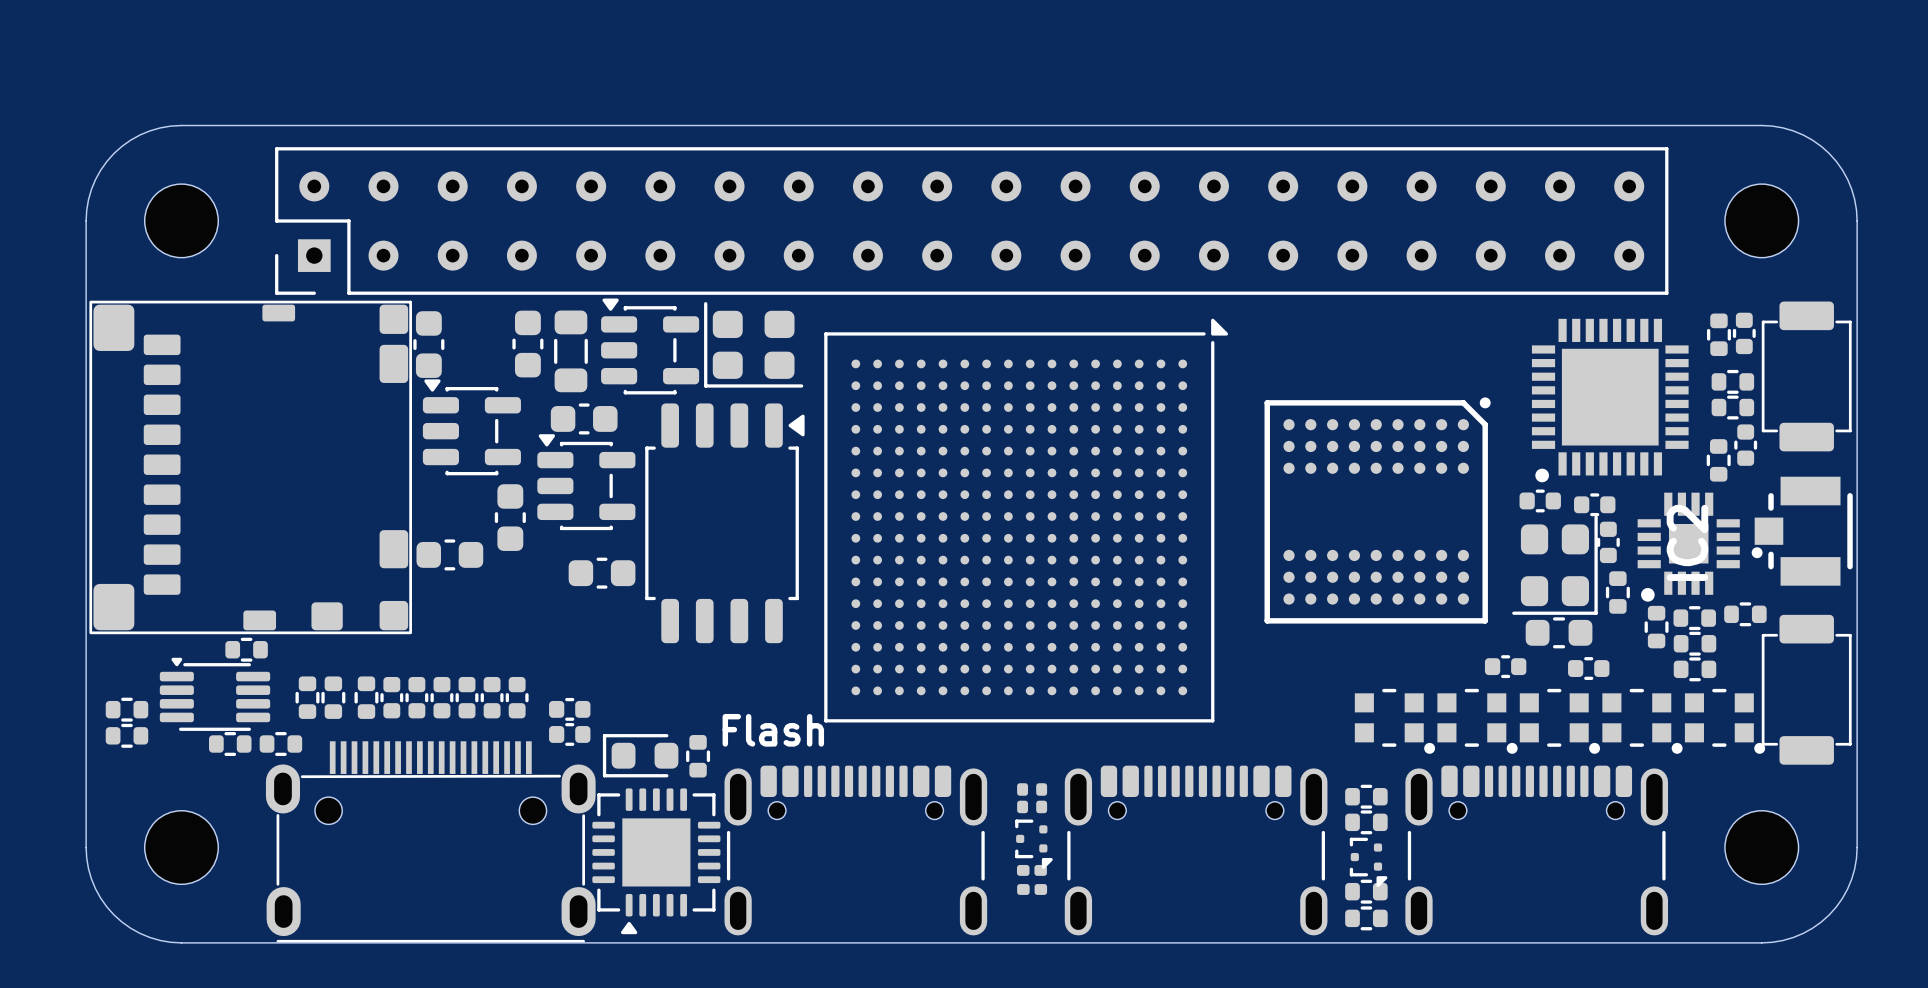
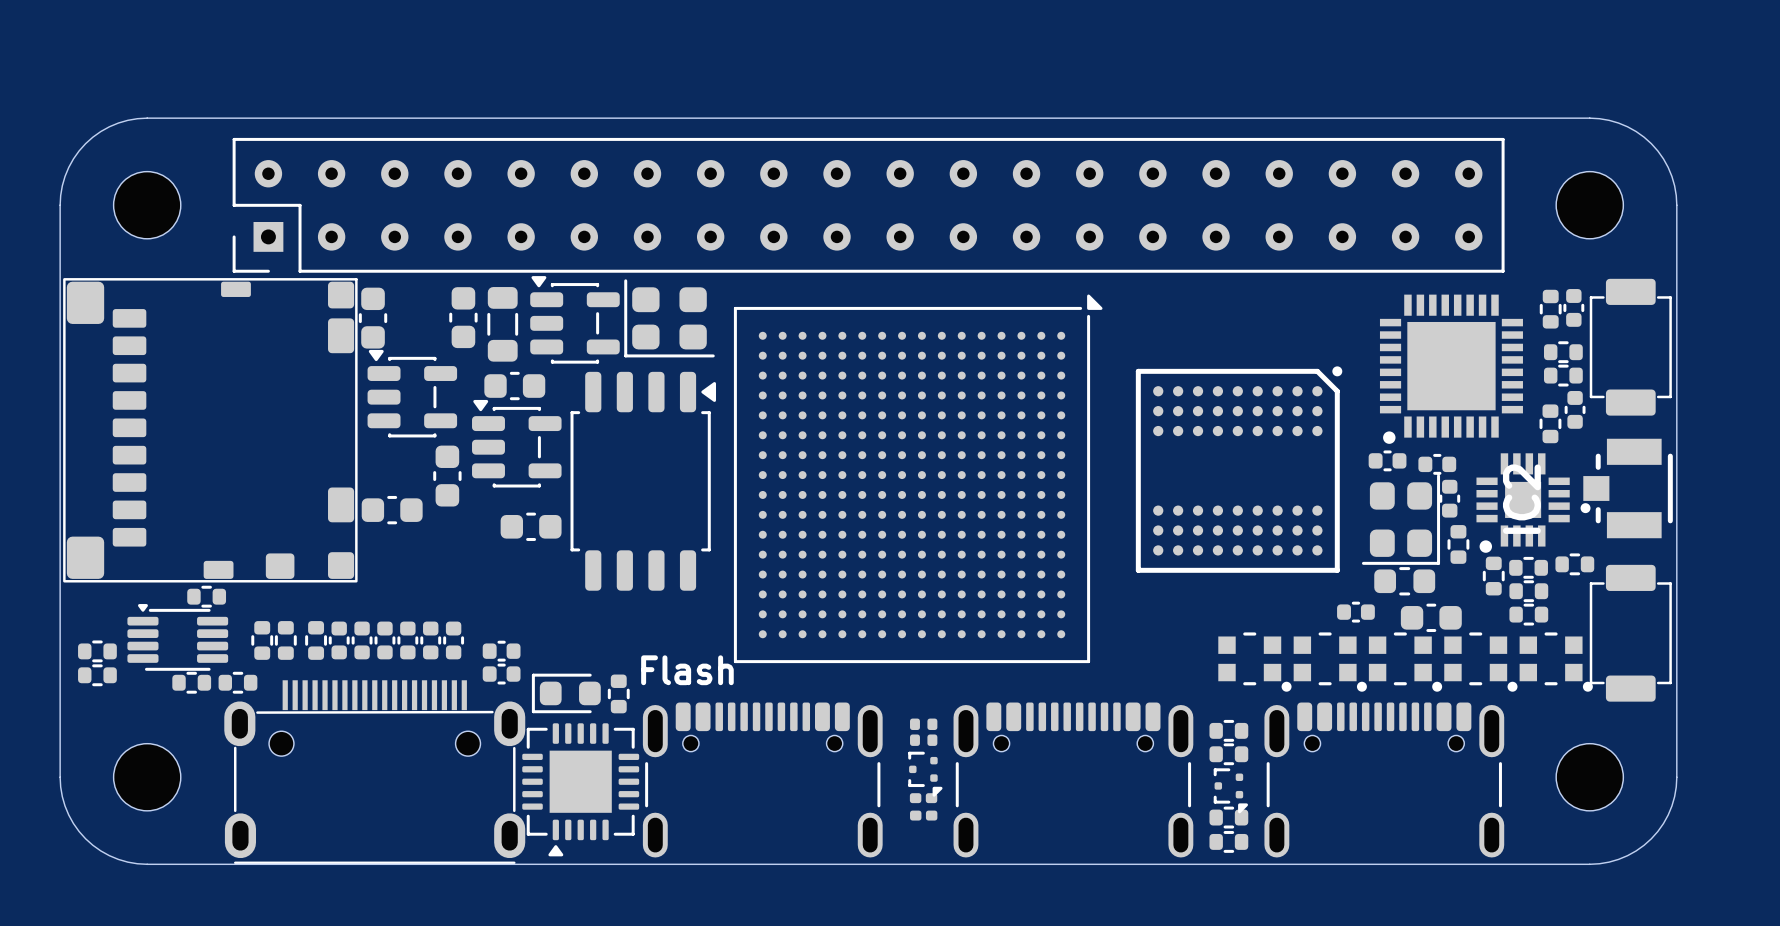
part footprint: [1568, 657, 1610, 680] -> [1400, 603, 1462, 633]

